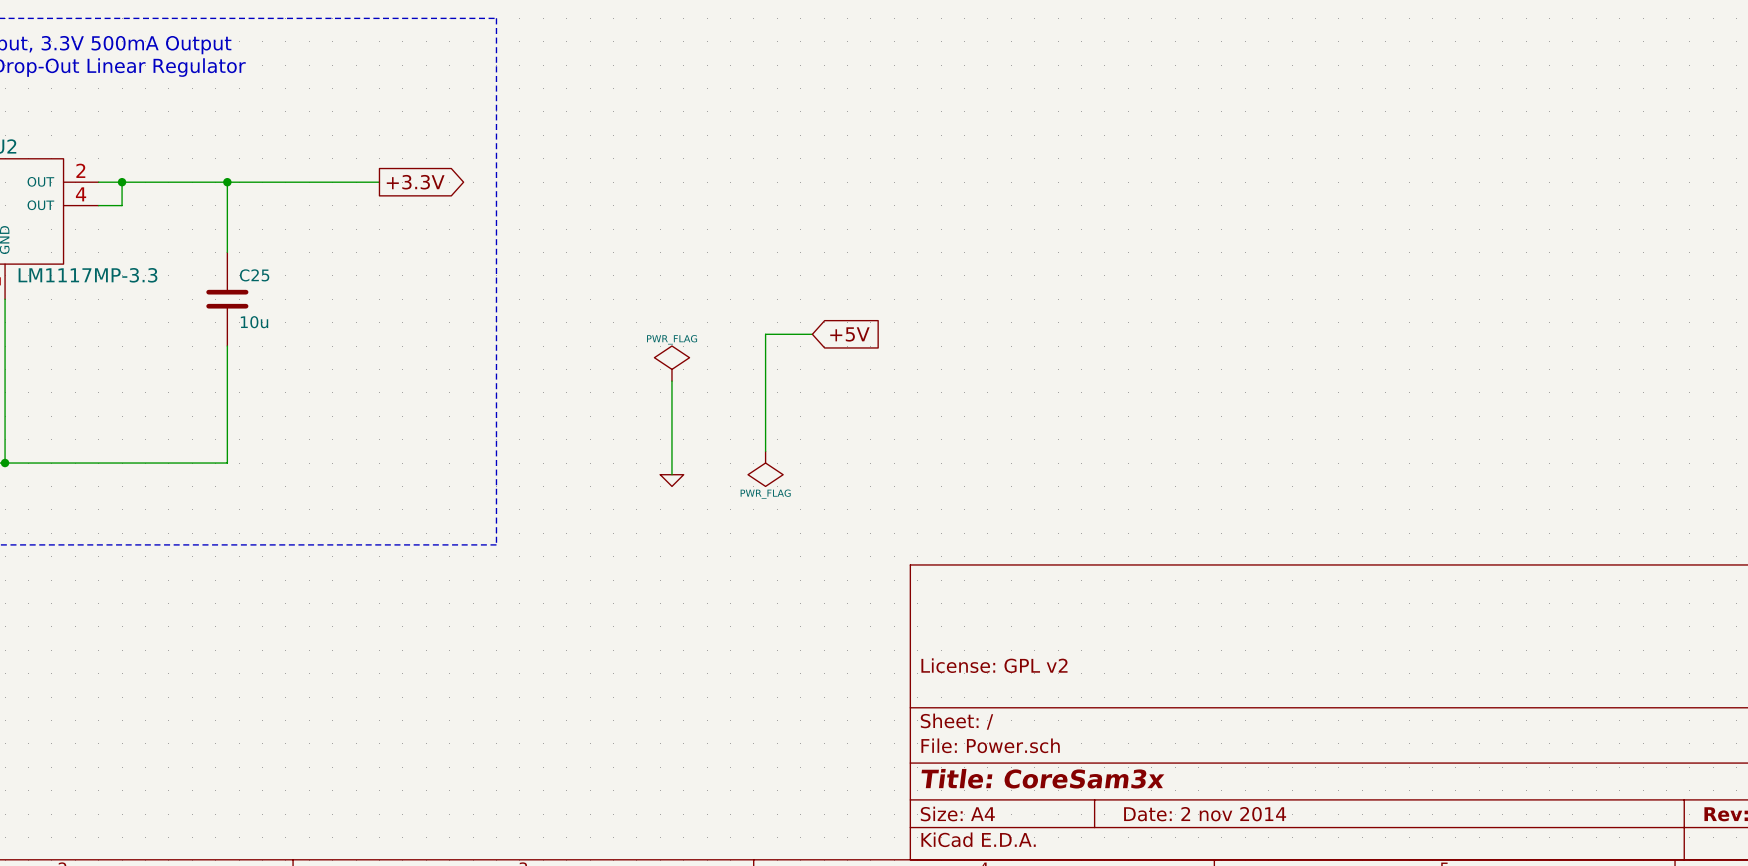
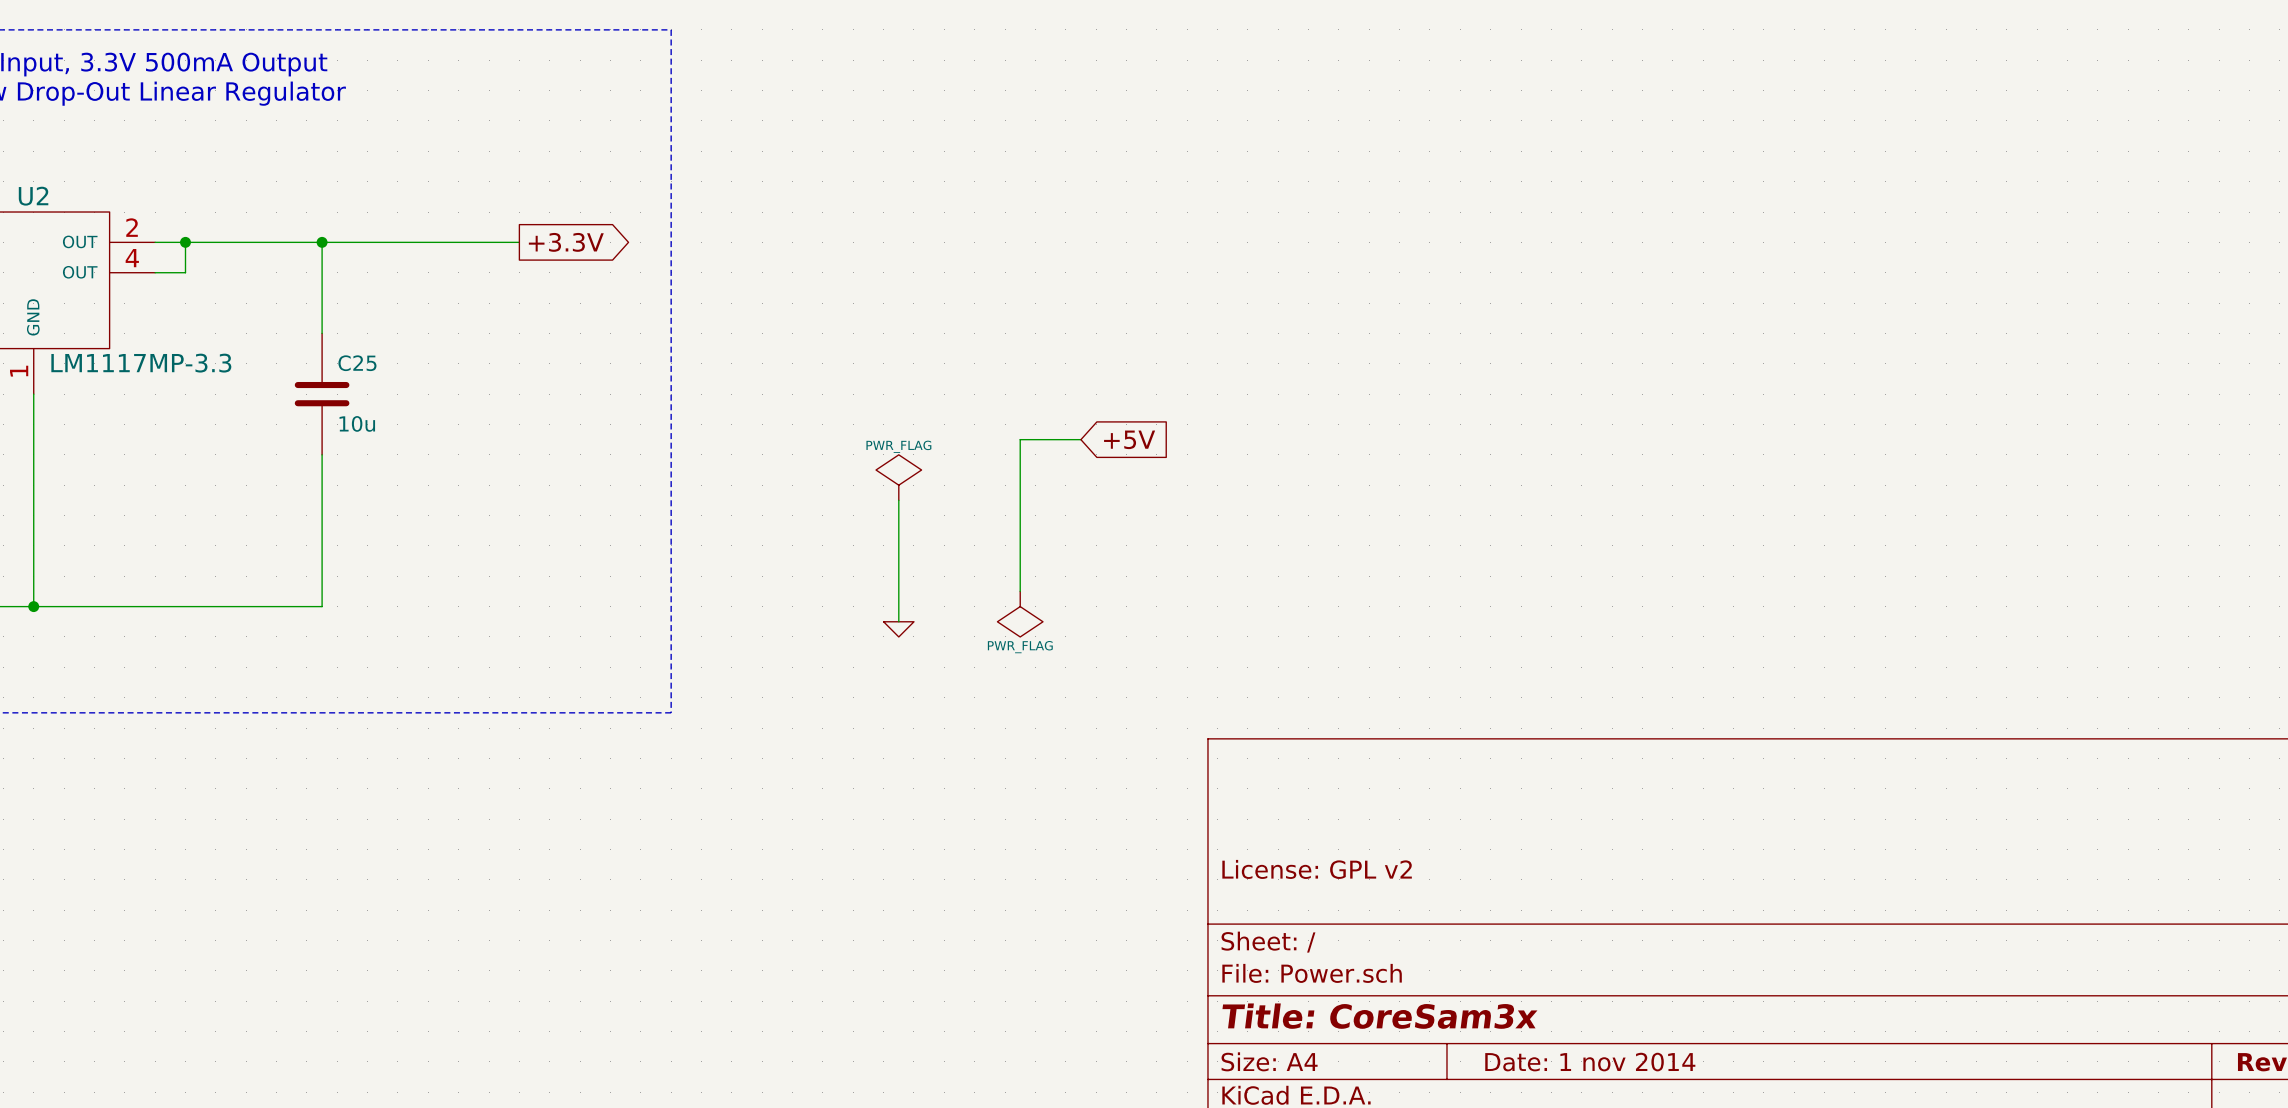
title block: Date: 2 nov 2014 (1205, 814) -> Date: 1 nov 2014 (1590, 1062)

